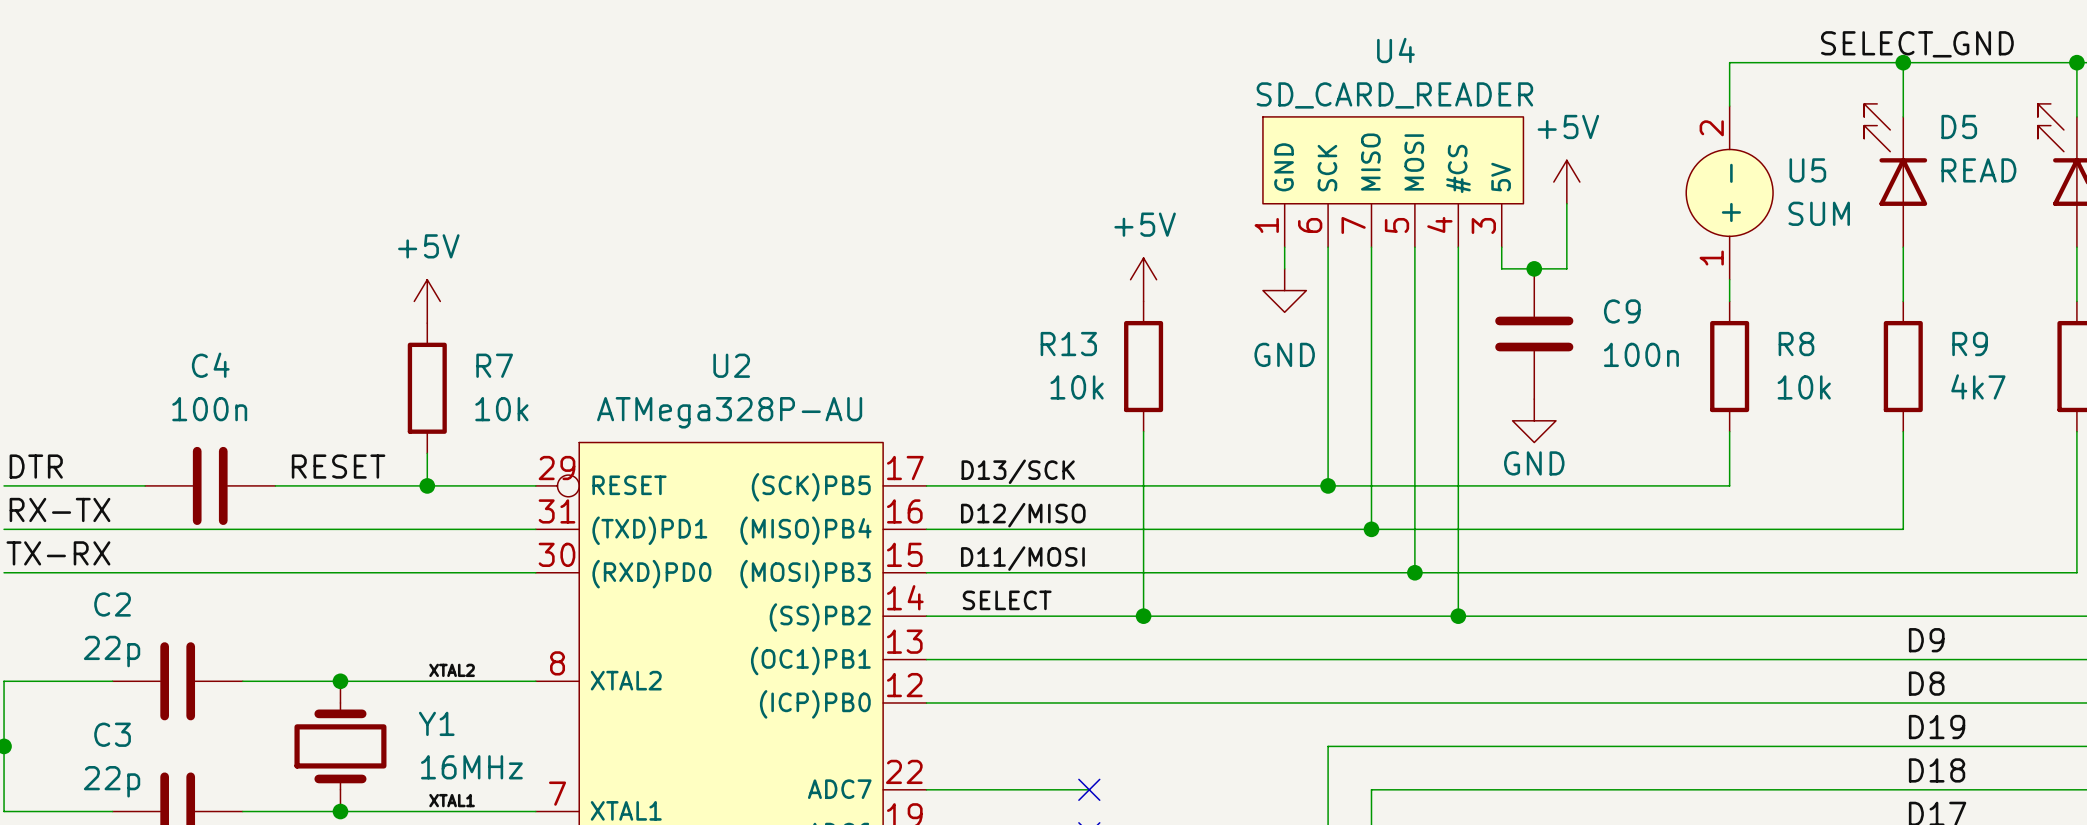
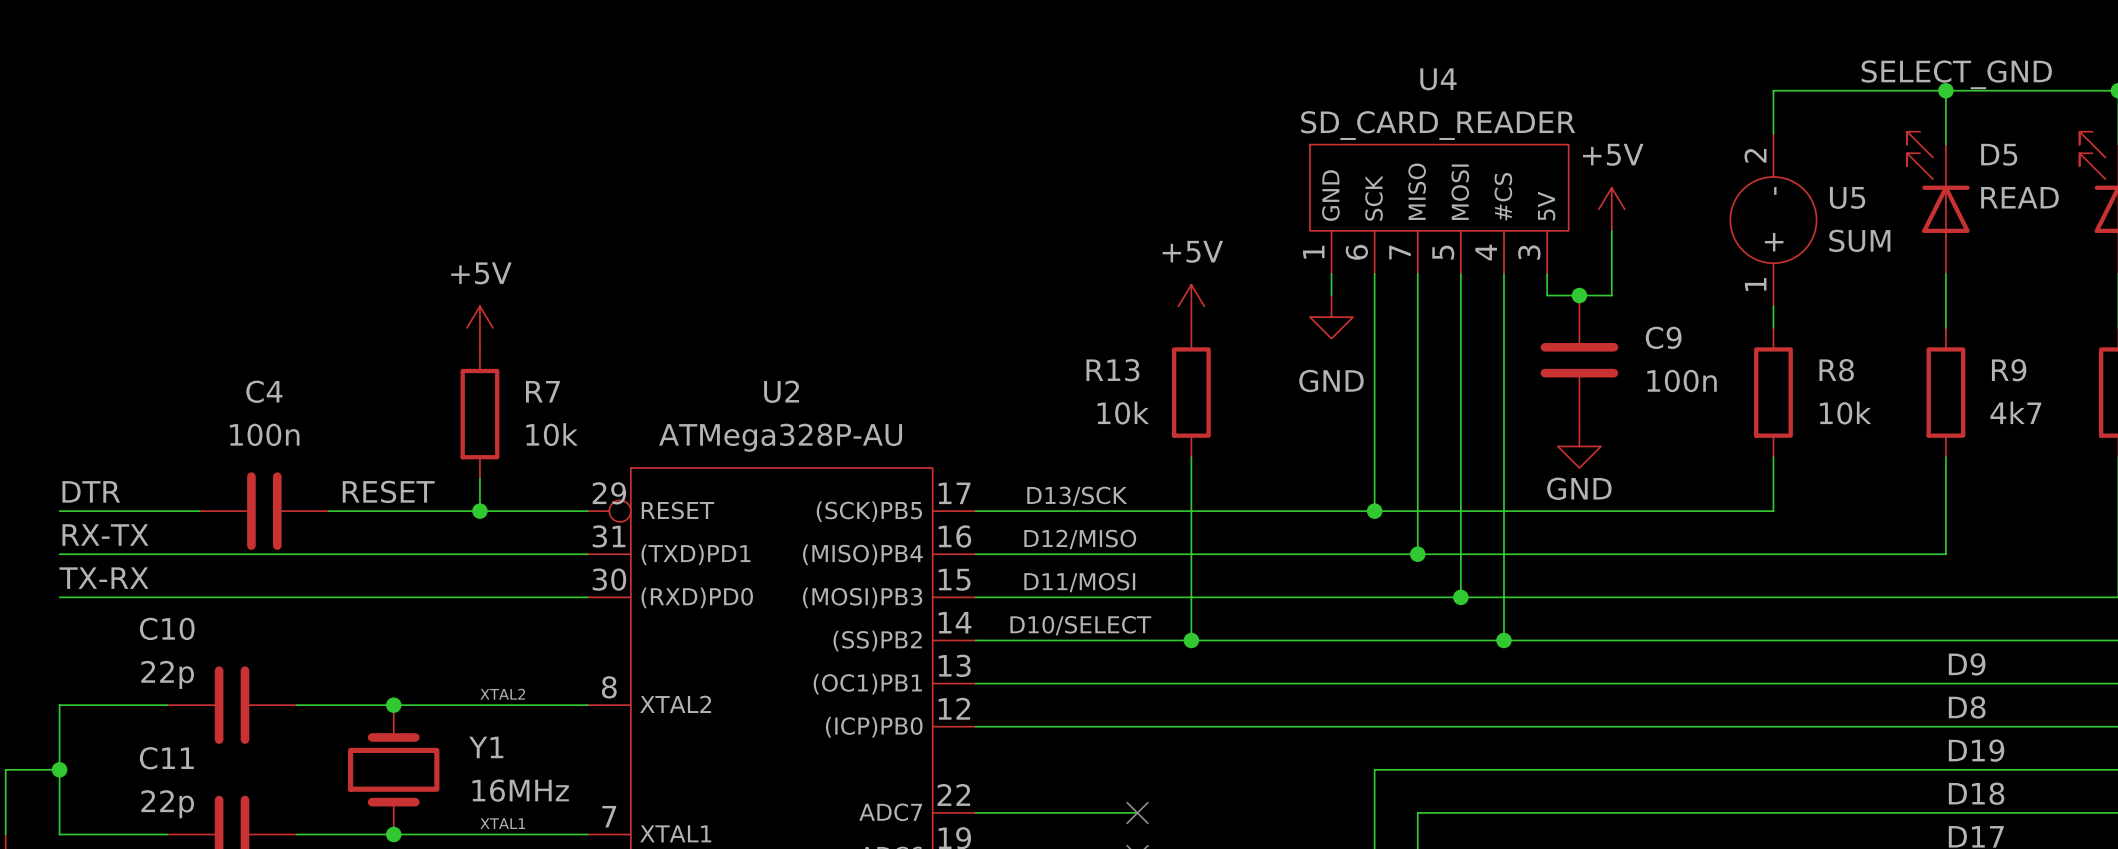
label: SELECT (1007, 600) -> D10/SELECT (1080, 625)
C2 name: C2 (112, 604) -> C10 (167, 628)
C3 name: C3 (112, 734) -> C11 (166, 758)

